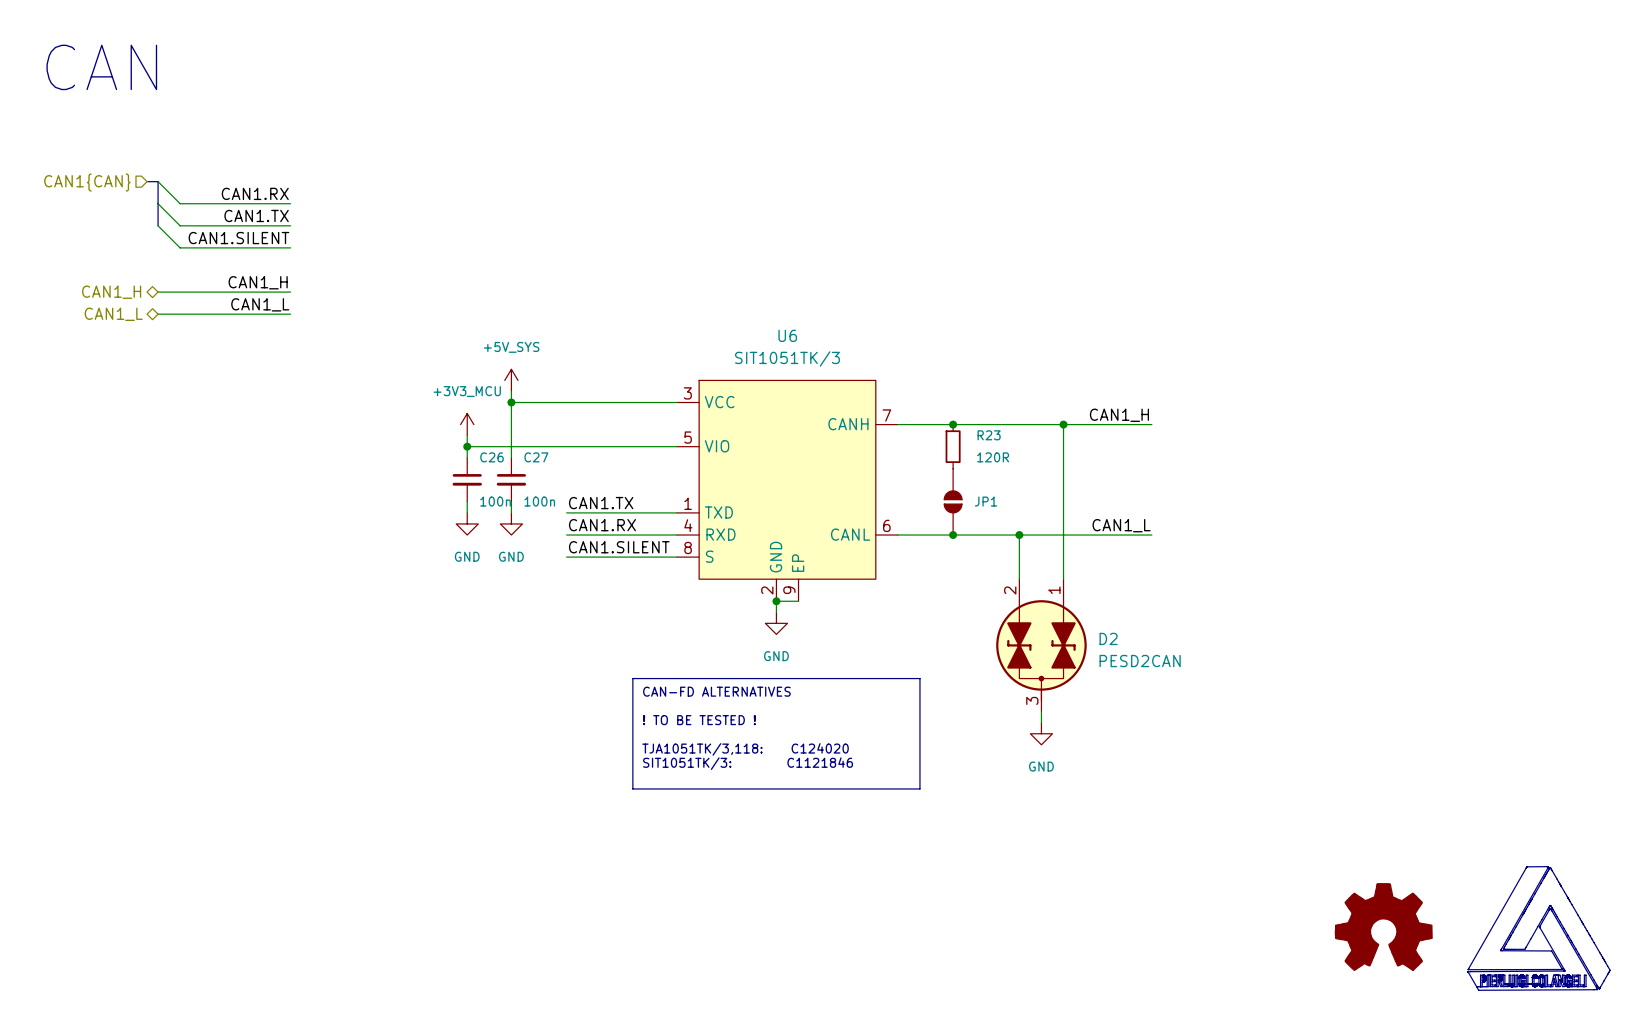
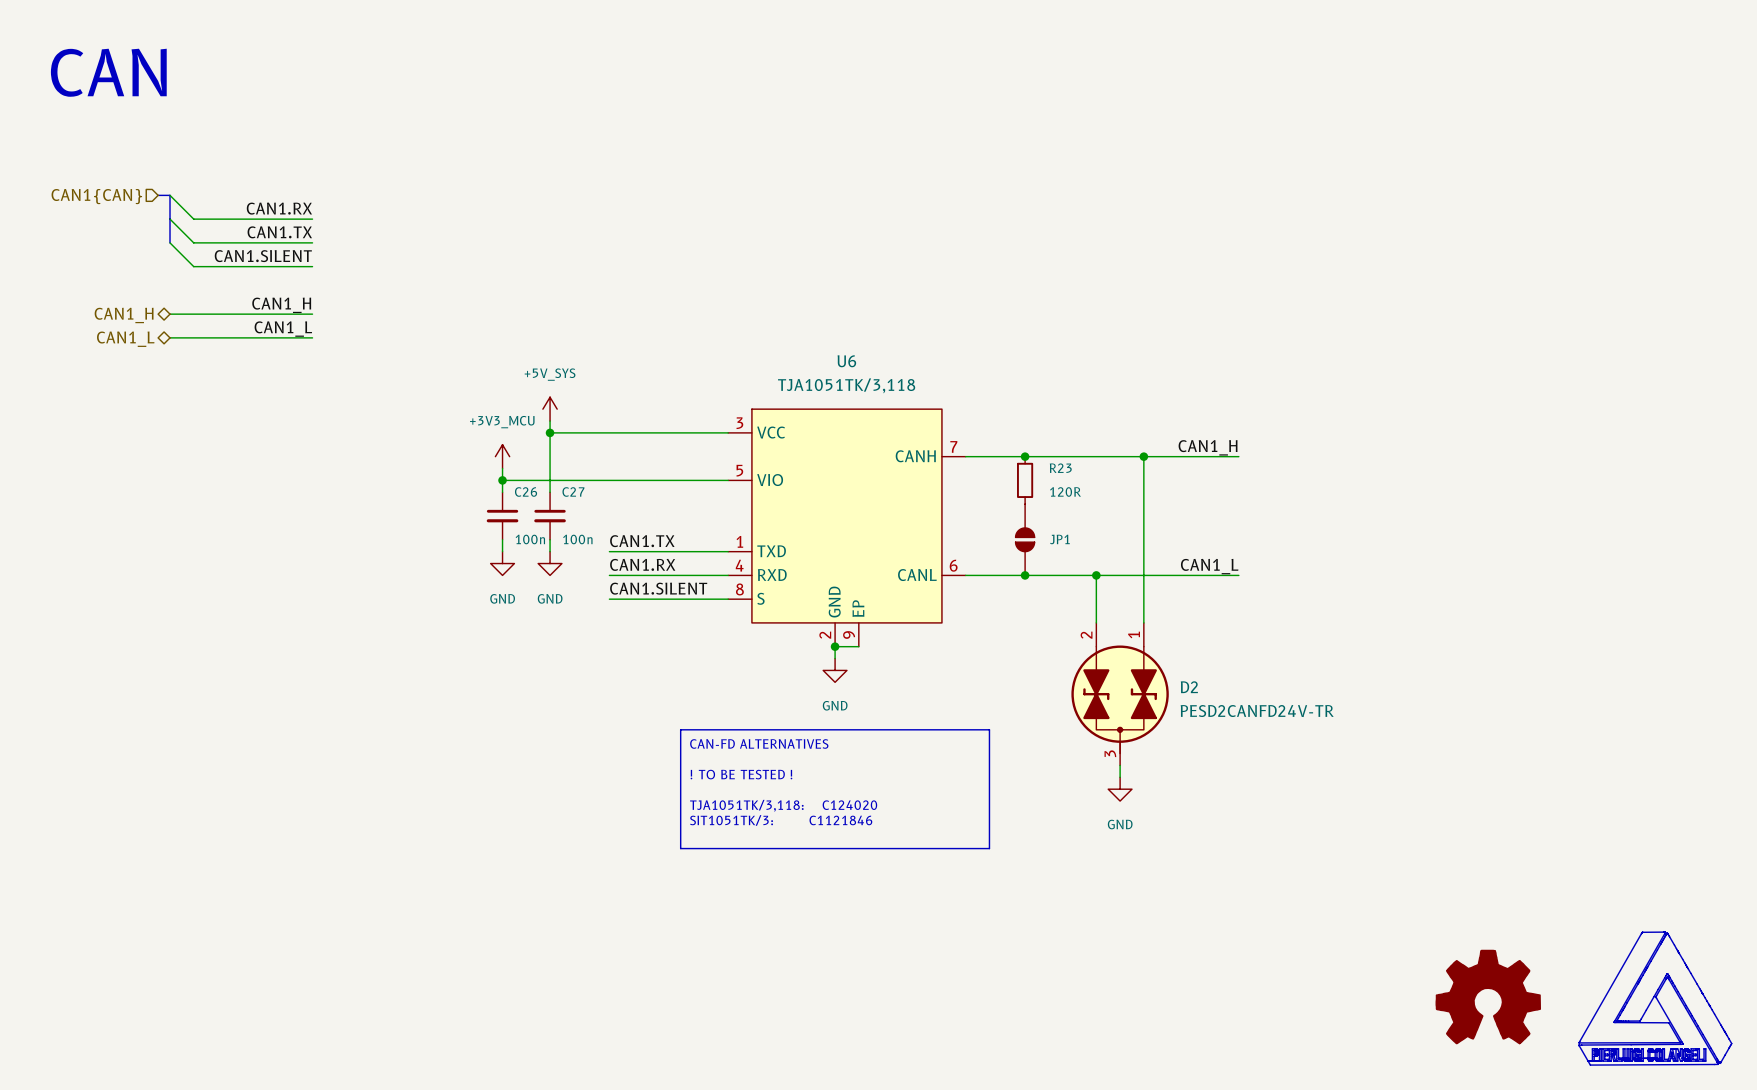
U6 value: SIT1051TK/3 (787, 358) -> TJA1051TK/3,118 (846, 385)
D2 value: PESD2CAN (1140, 661) -> PESD2CANFD24V-TR (1257, 711)

